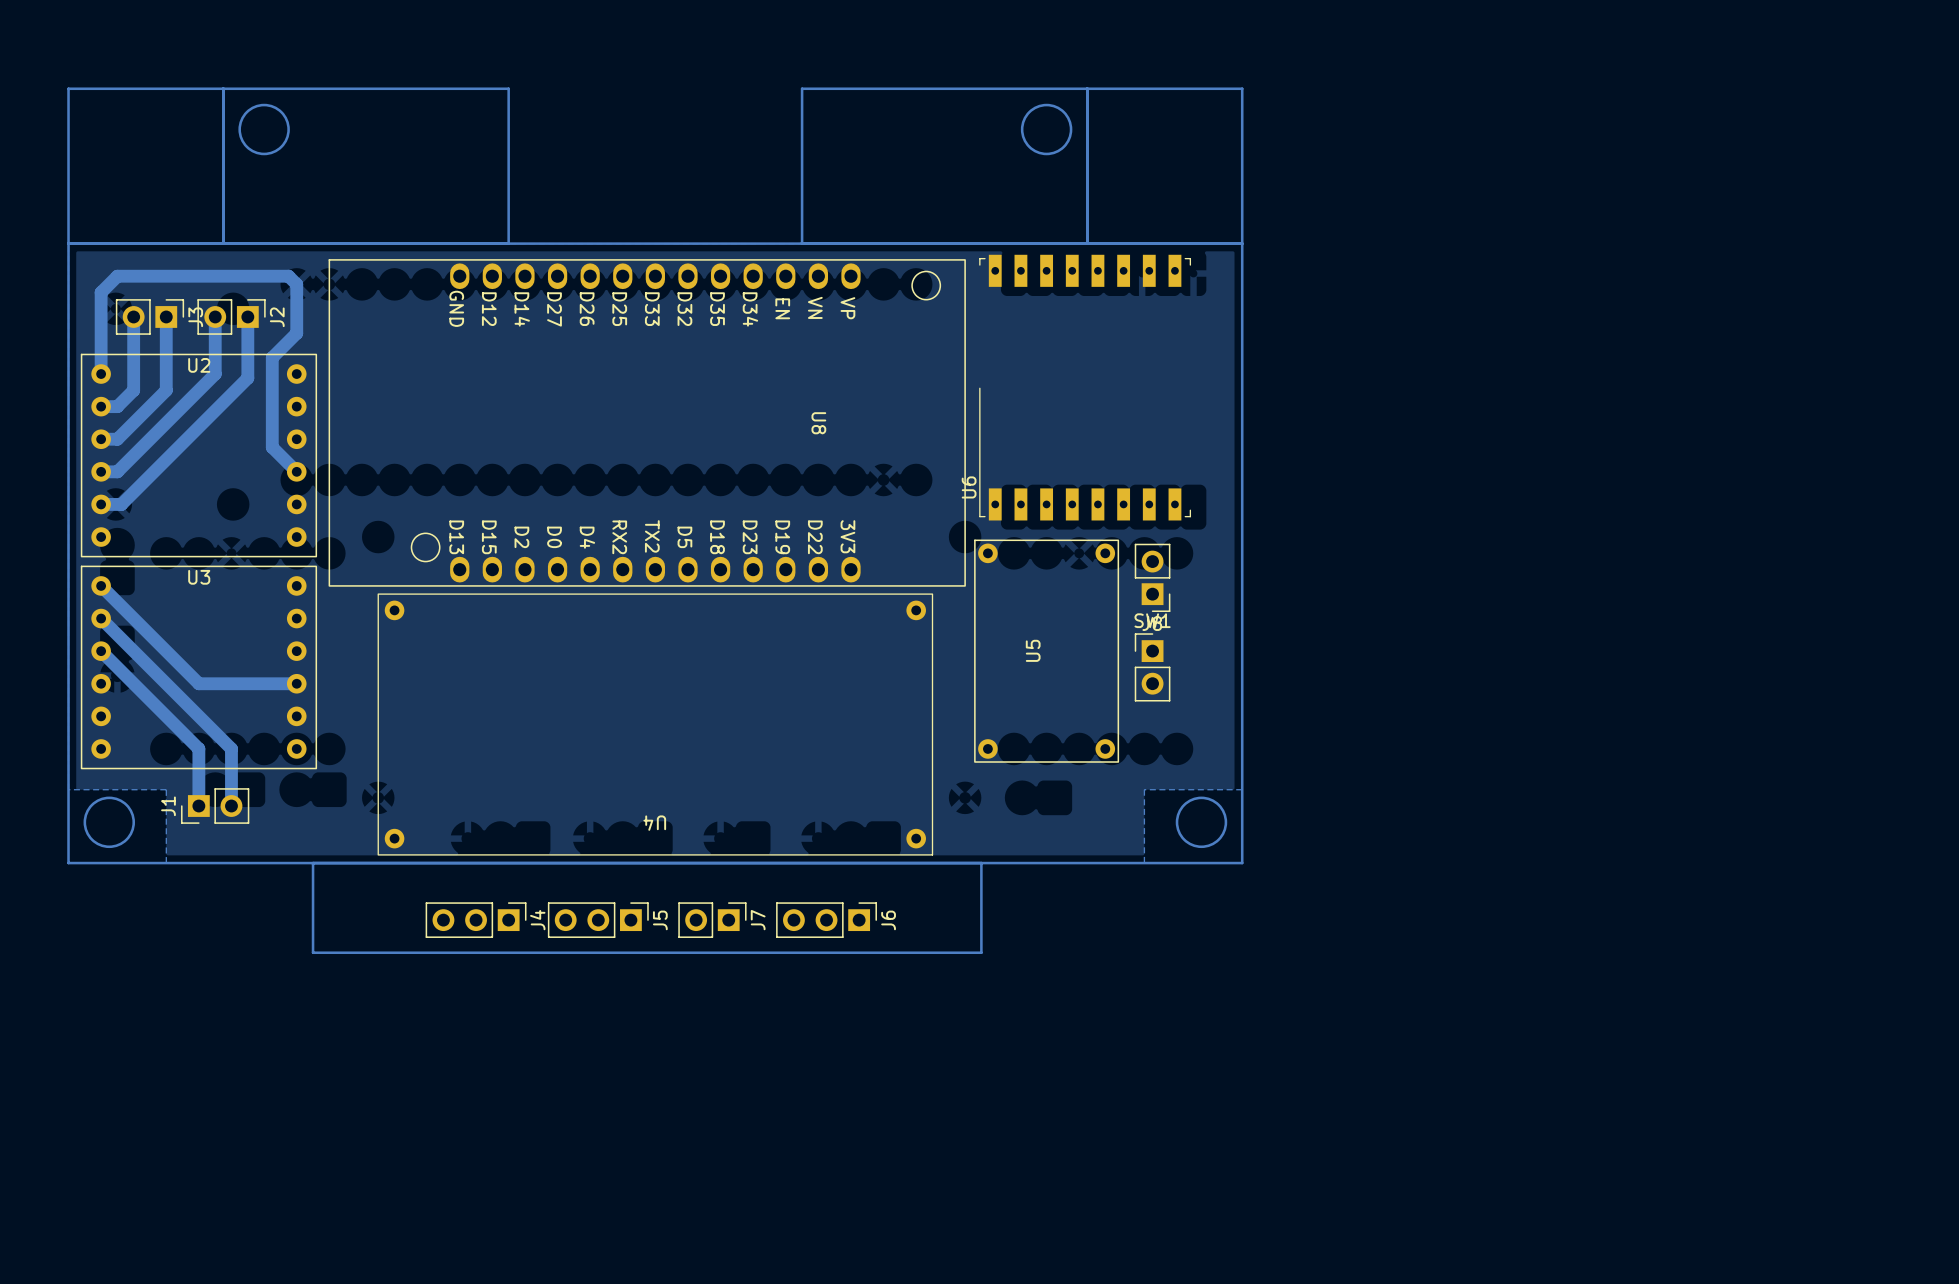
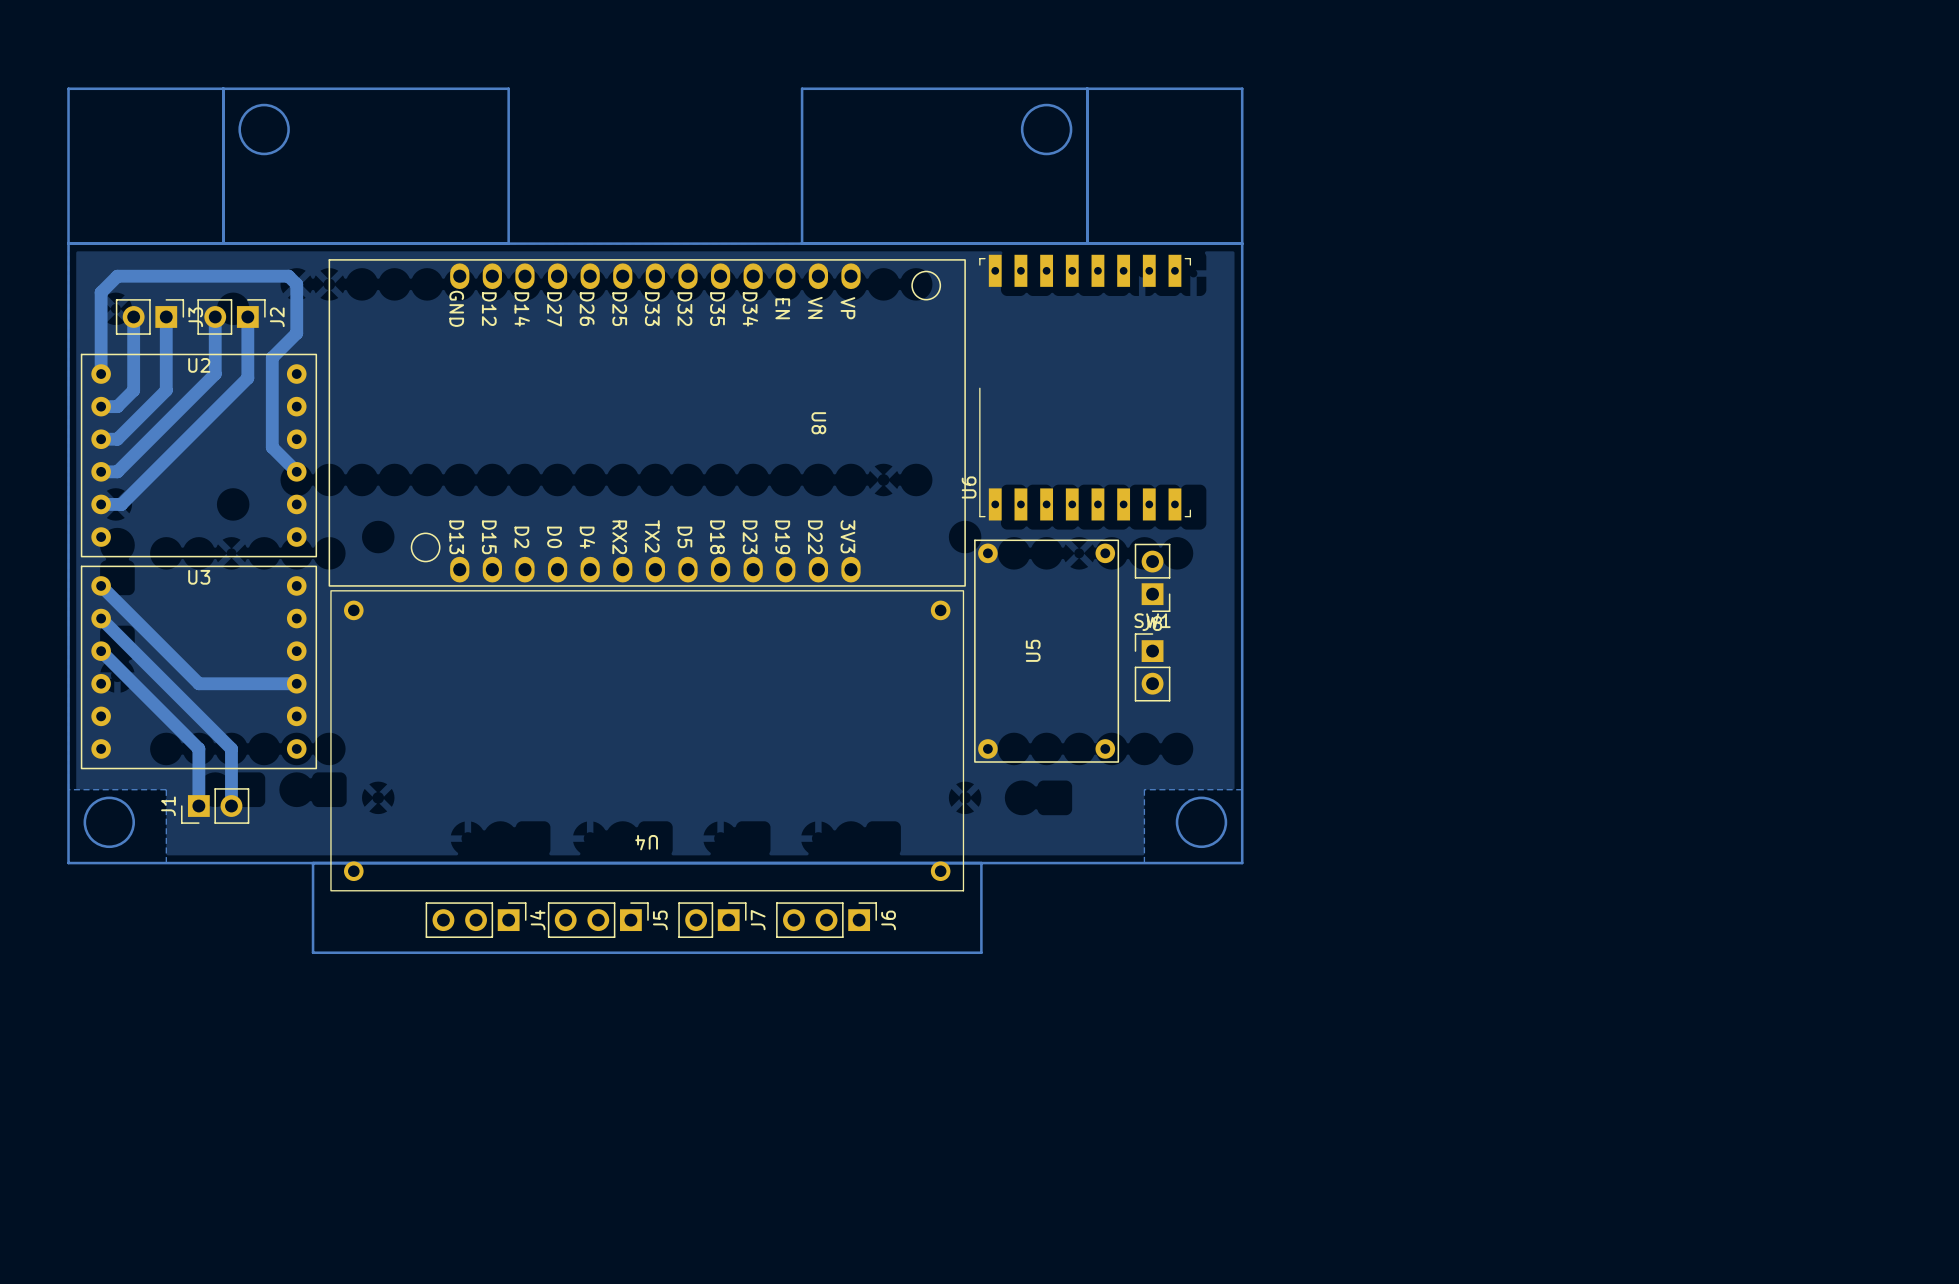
U4 footprint: [377, 593, 934, 856] -> [330, 590, 965, 892]

